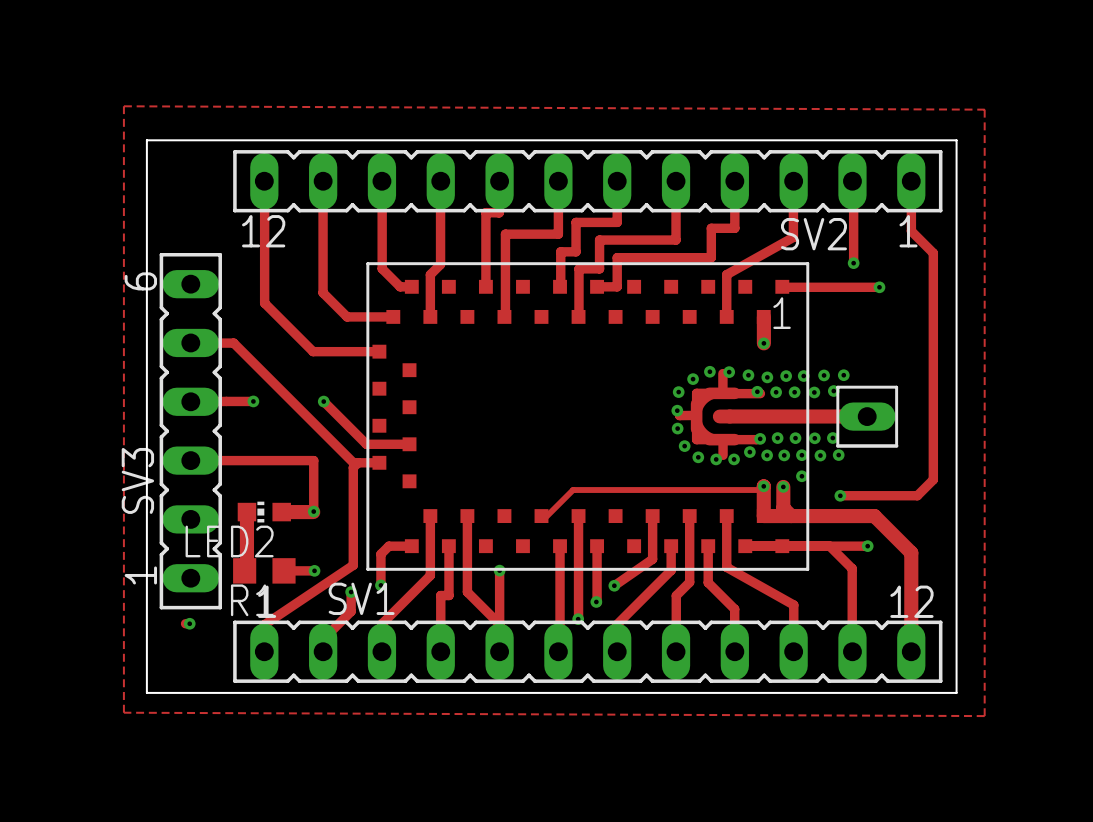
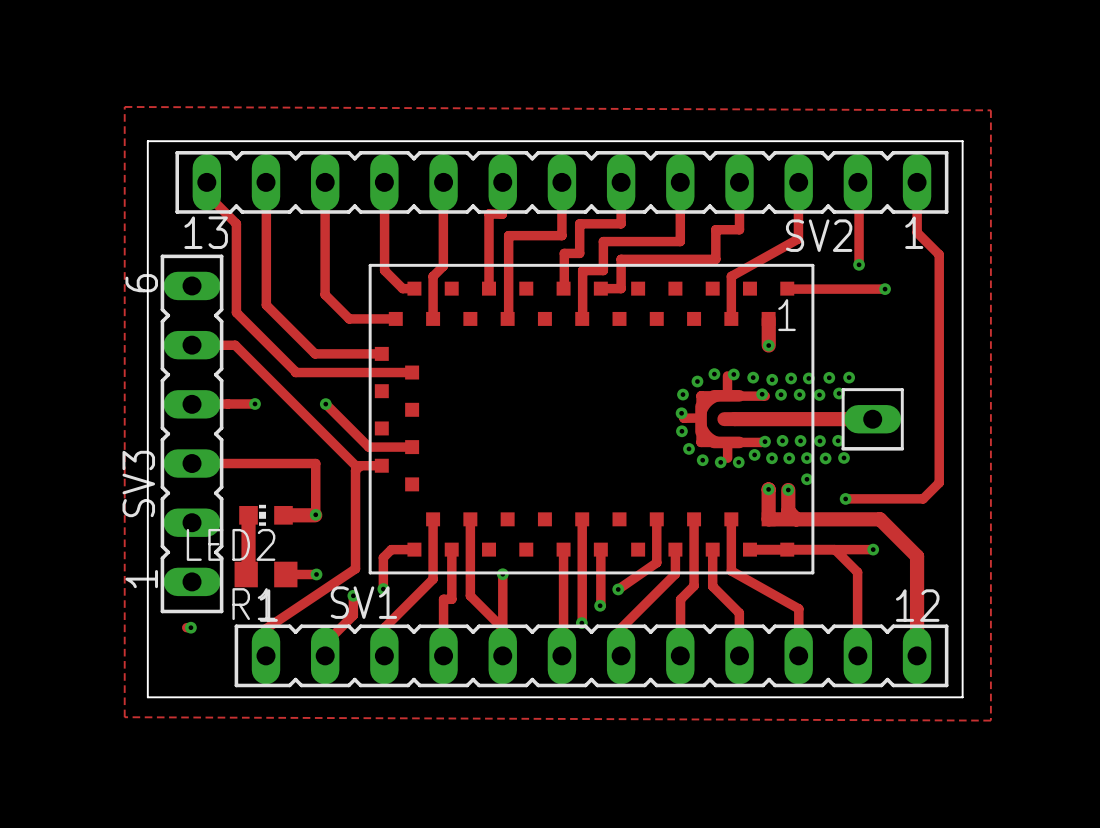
SV2 footprint: [233, 150, 943, 213] -> [175, 151, 949, 214]
track: none -> (206, 182) (206, 194) (236, 223) (236, 312) (295, 372) (412, 372)
track: (764, 490) (573, 490) (543, 519) (541, 516) -> none

